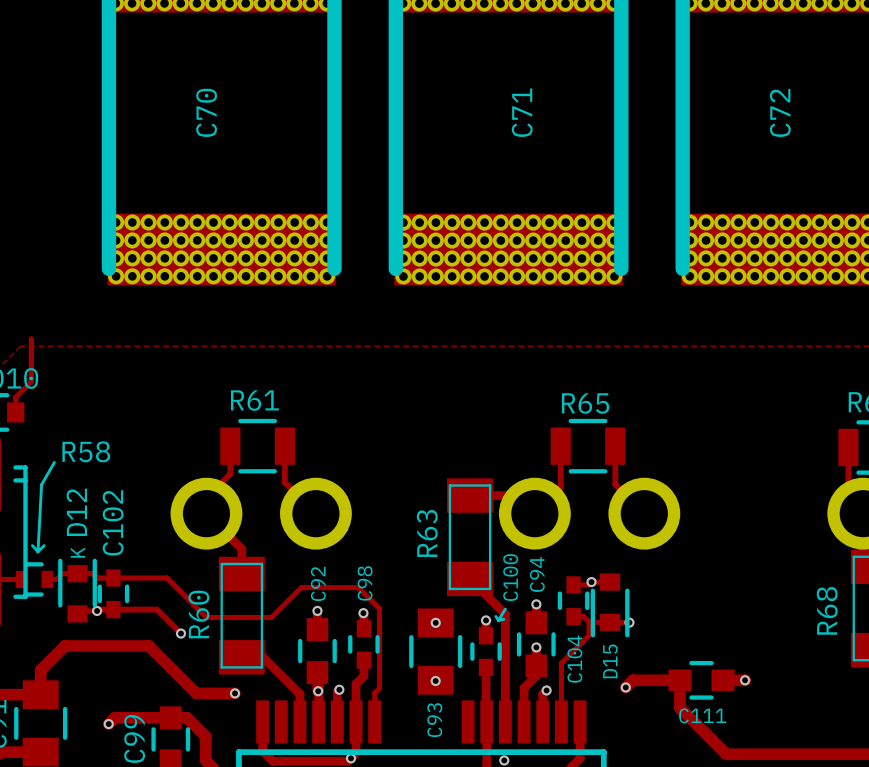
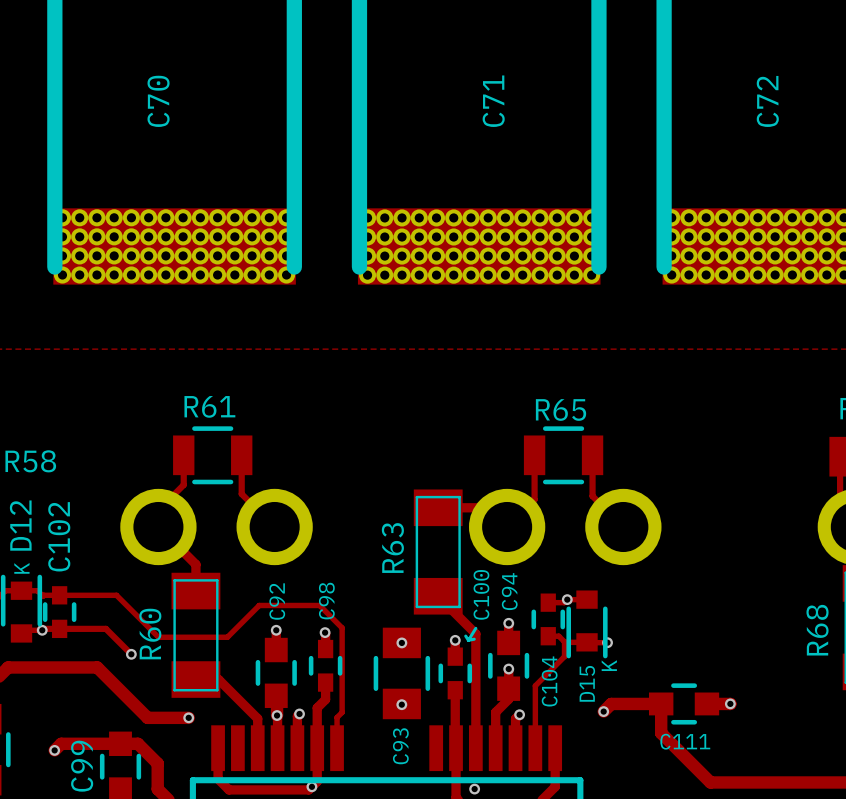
text: none -> K (609, 665)

